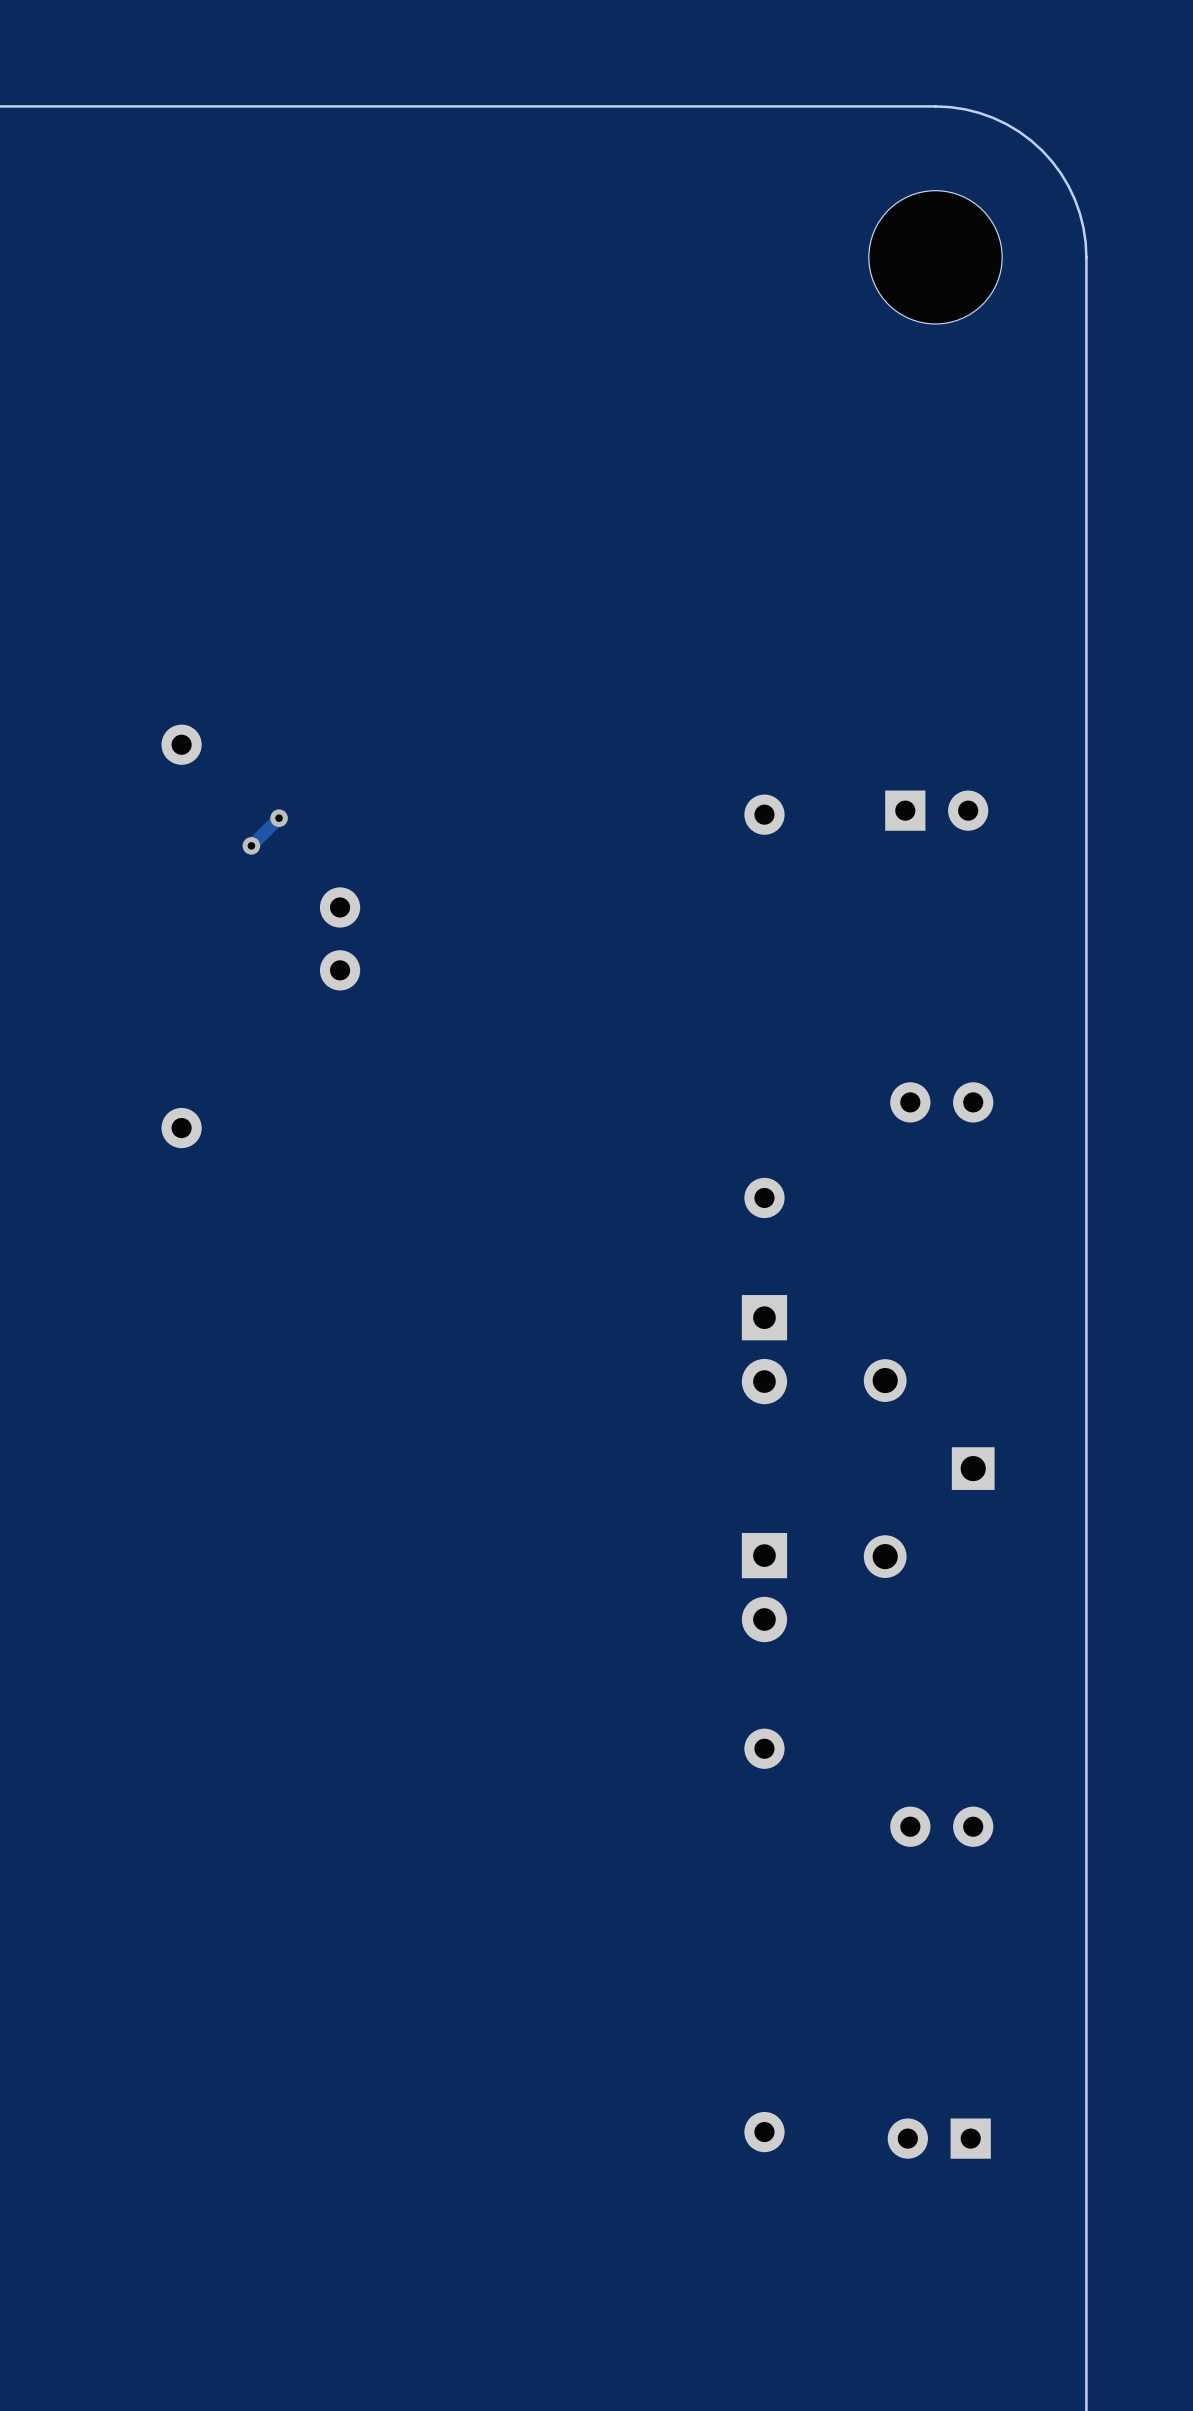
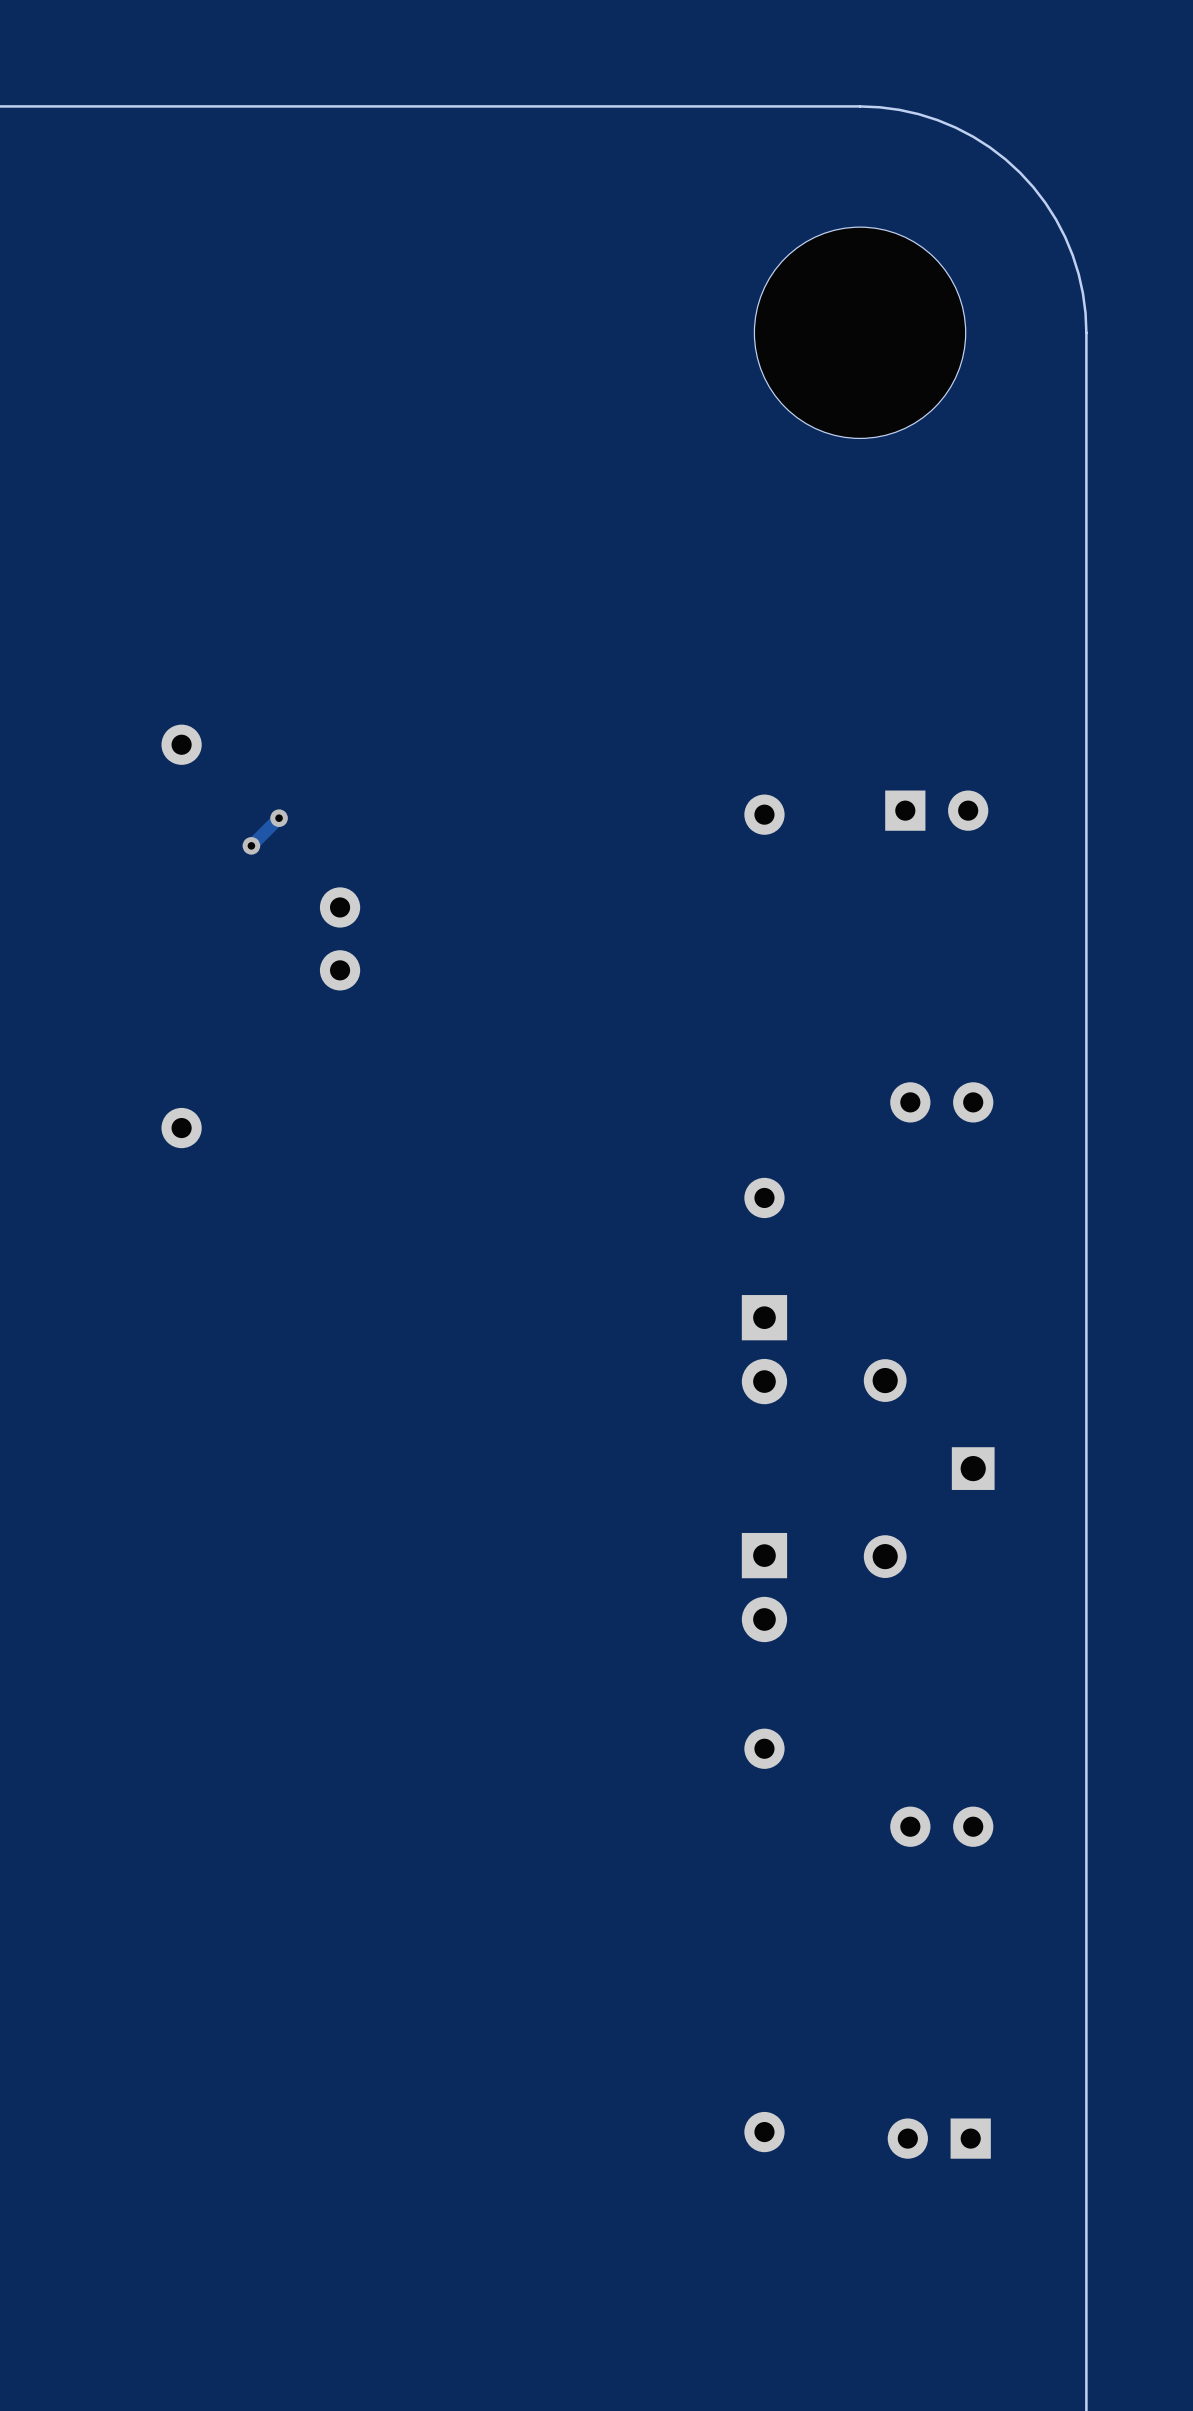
board edge: (860, 106) (935, 106) (964, 109) (1006, 124) (1042, 150) (1068, 186) (1083, 227) (1086, 257) (1086, 332) -> (860, 106) (899, 109) (918, 114) (955, 127) (989, 147) (1020, 172) (1045, 202) (1065, 237) (1072, 255) (1082, 293) (1086, 332)
part: (935, 257) -> none
part: none -> (860, 332)

